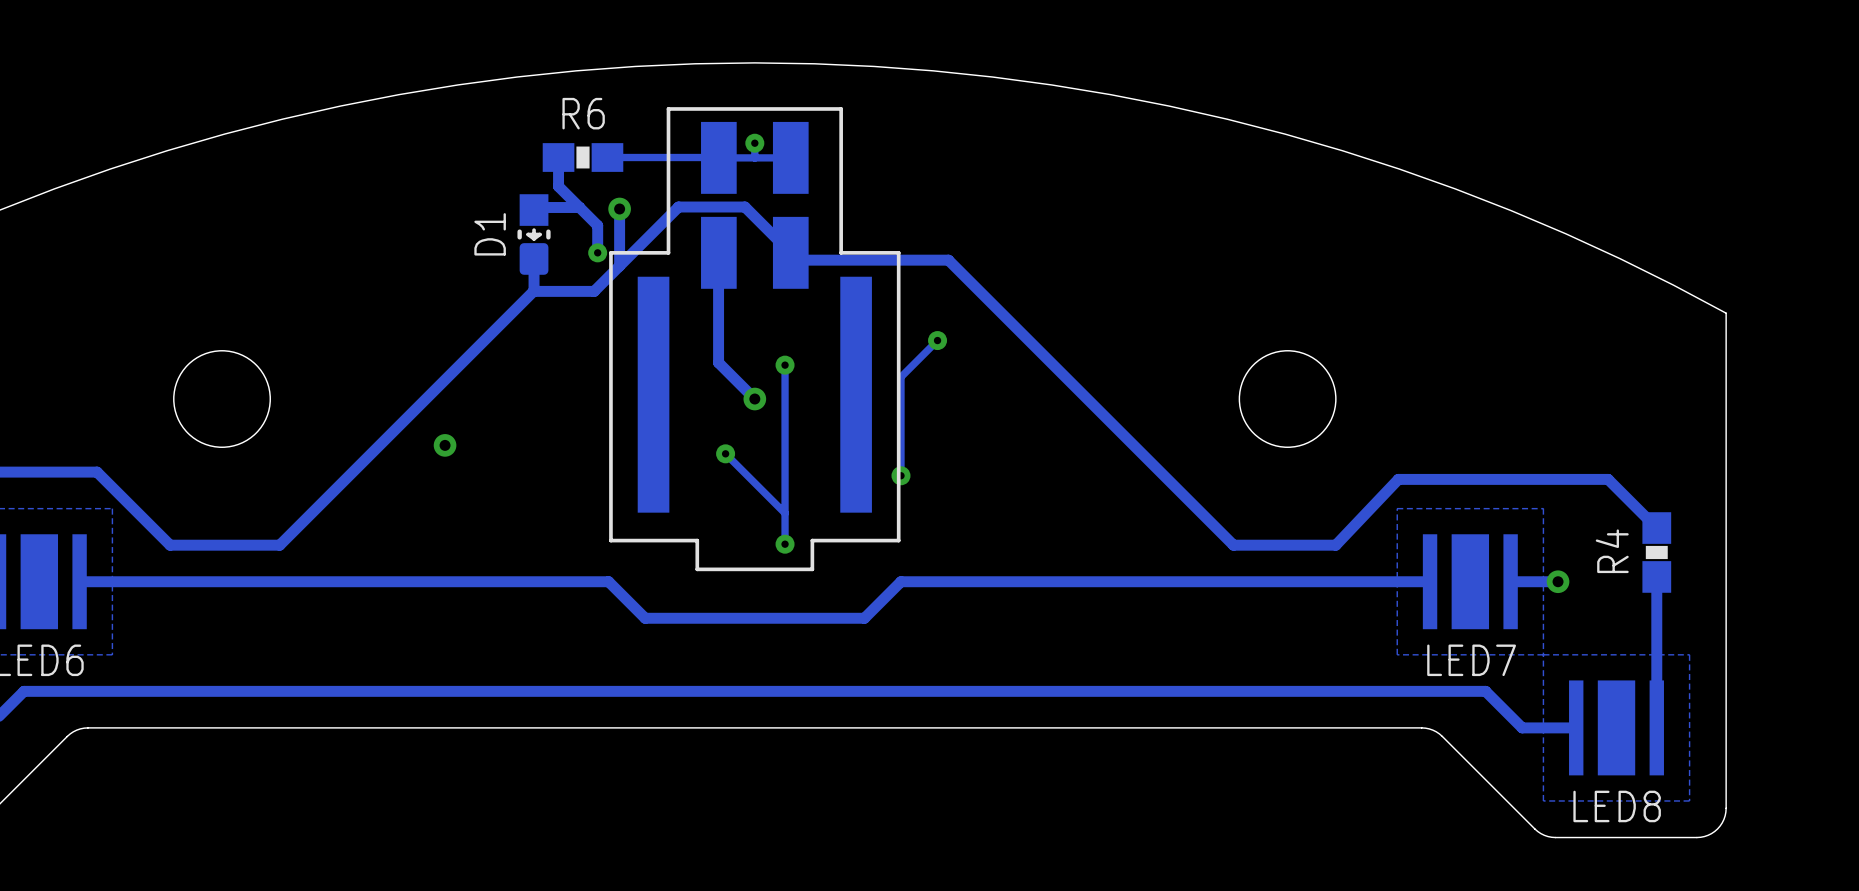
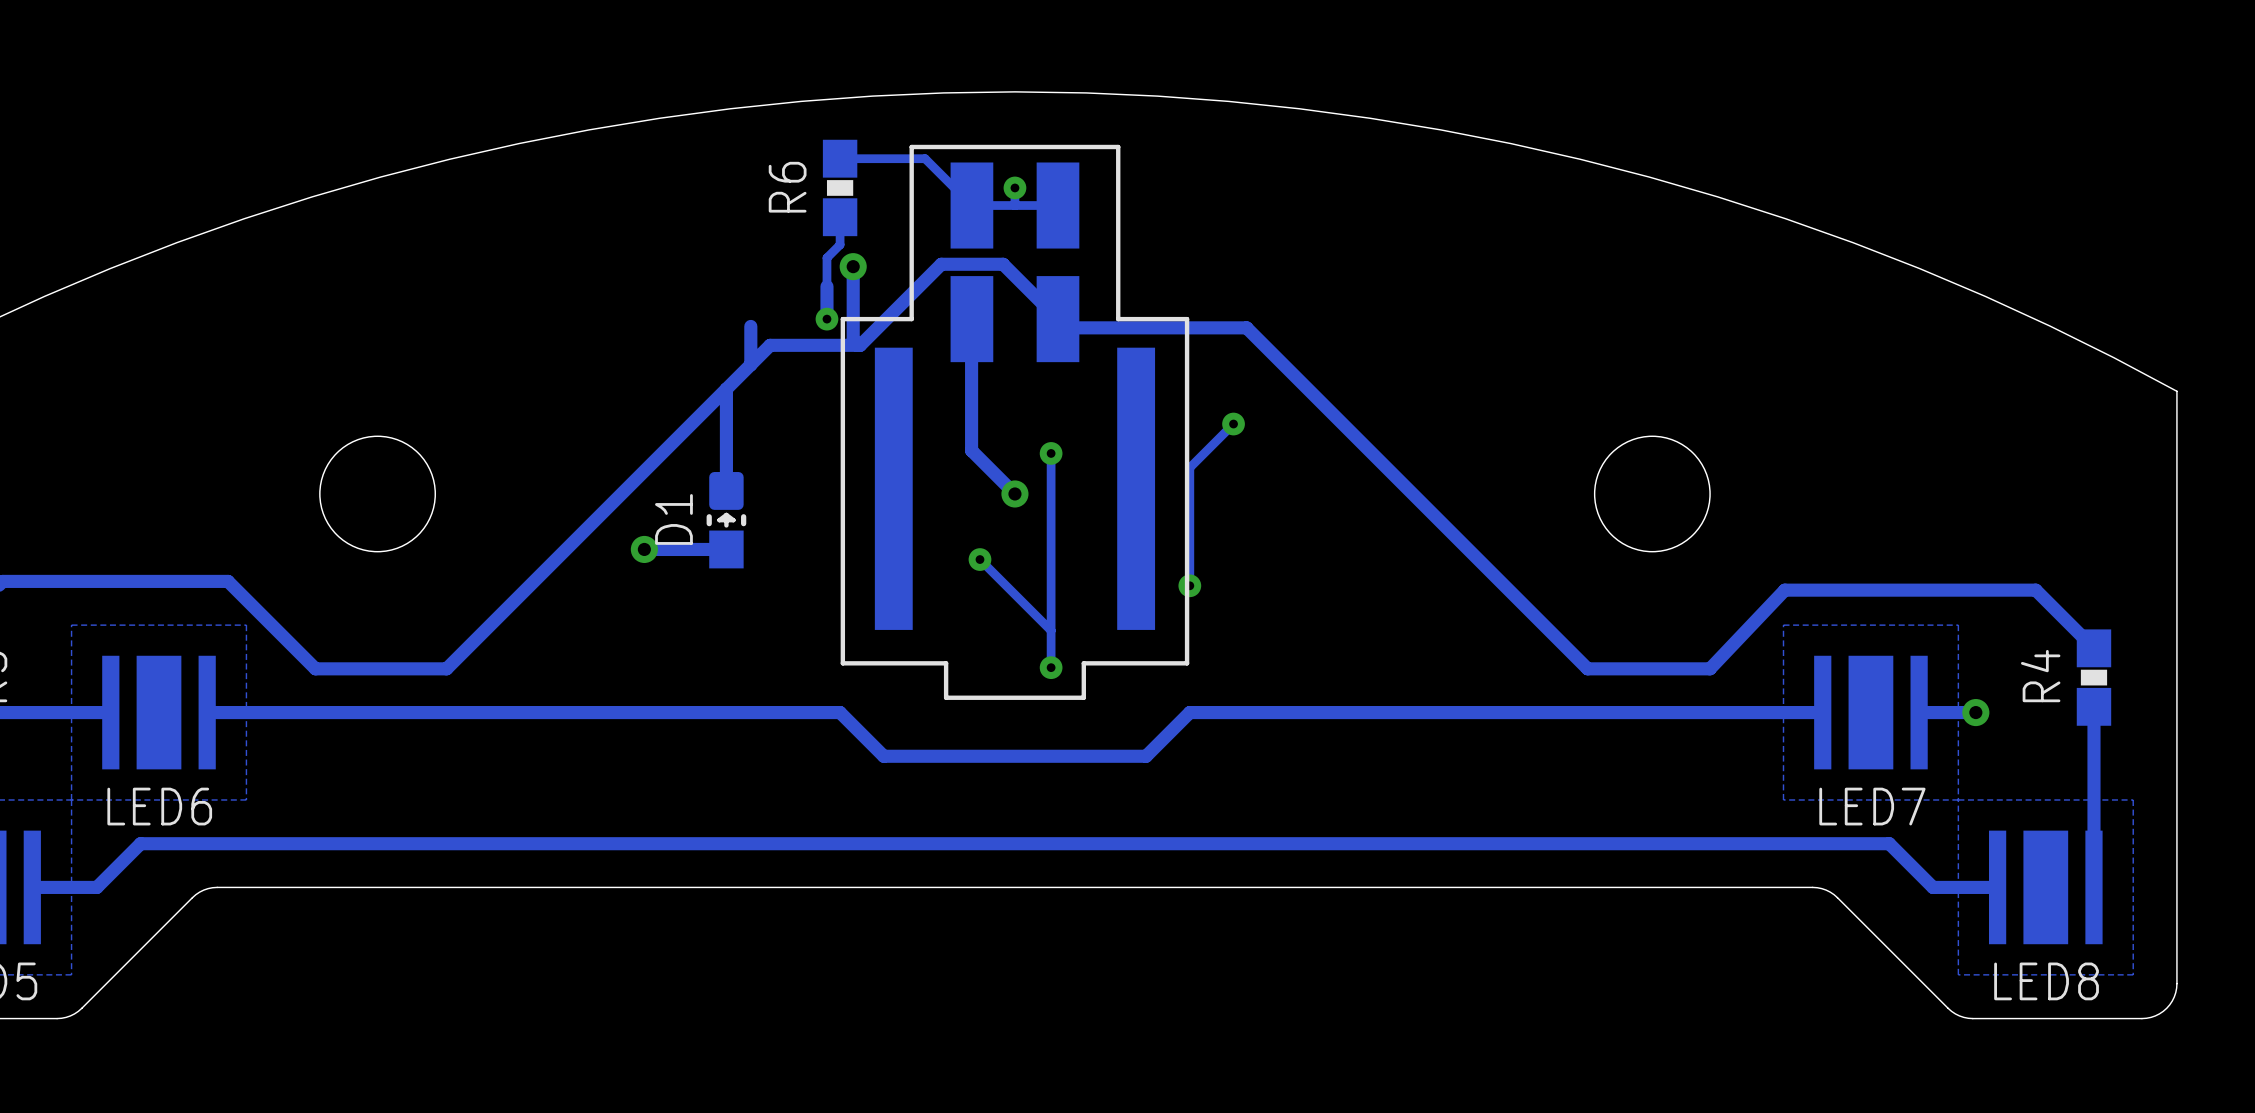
R6 name position: R6 (583, 113) -> R6 (787, 187)
track: (558, 157) (558, 186) (597, 225) -> (840, 217) (840, 244) (826, 257) (826, 286)
R6 rotation: 0° (583, 157) -> 90° clockwise (840, 187)
track: (718, 157) (607, 157) -> (971, 205) (925, 158) (840, 158)
track: (579, 207) (536, 207) (534, 210) -> none
track: (693, 207) (678, 207) (594, 291) (533, 291) -> (941, 264) (860, 345) (770, 345) (750, 364)
D1 rotation: 0° (534, 234) -> 180° (726, 520)
D1 position: (534, 234) -> (726, 520)
track: none -> (726, 389) (726, 490)
track: none -> (726, 549) (644, 549)

